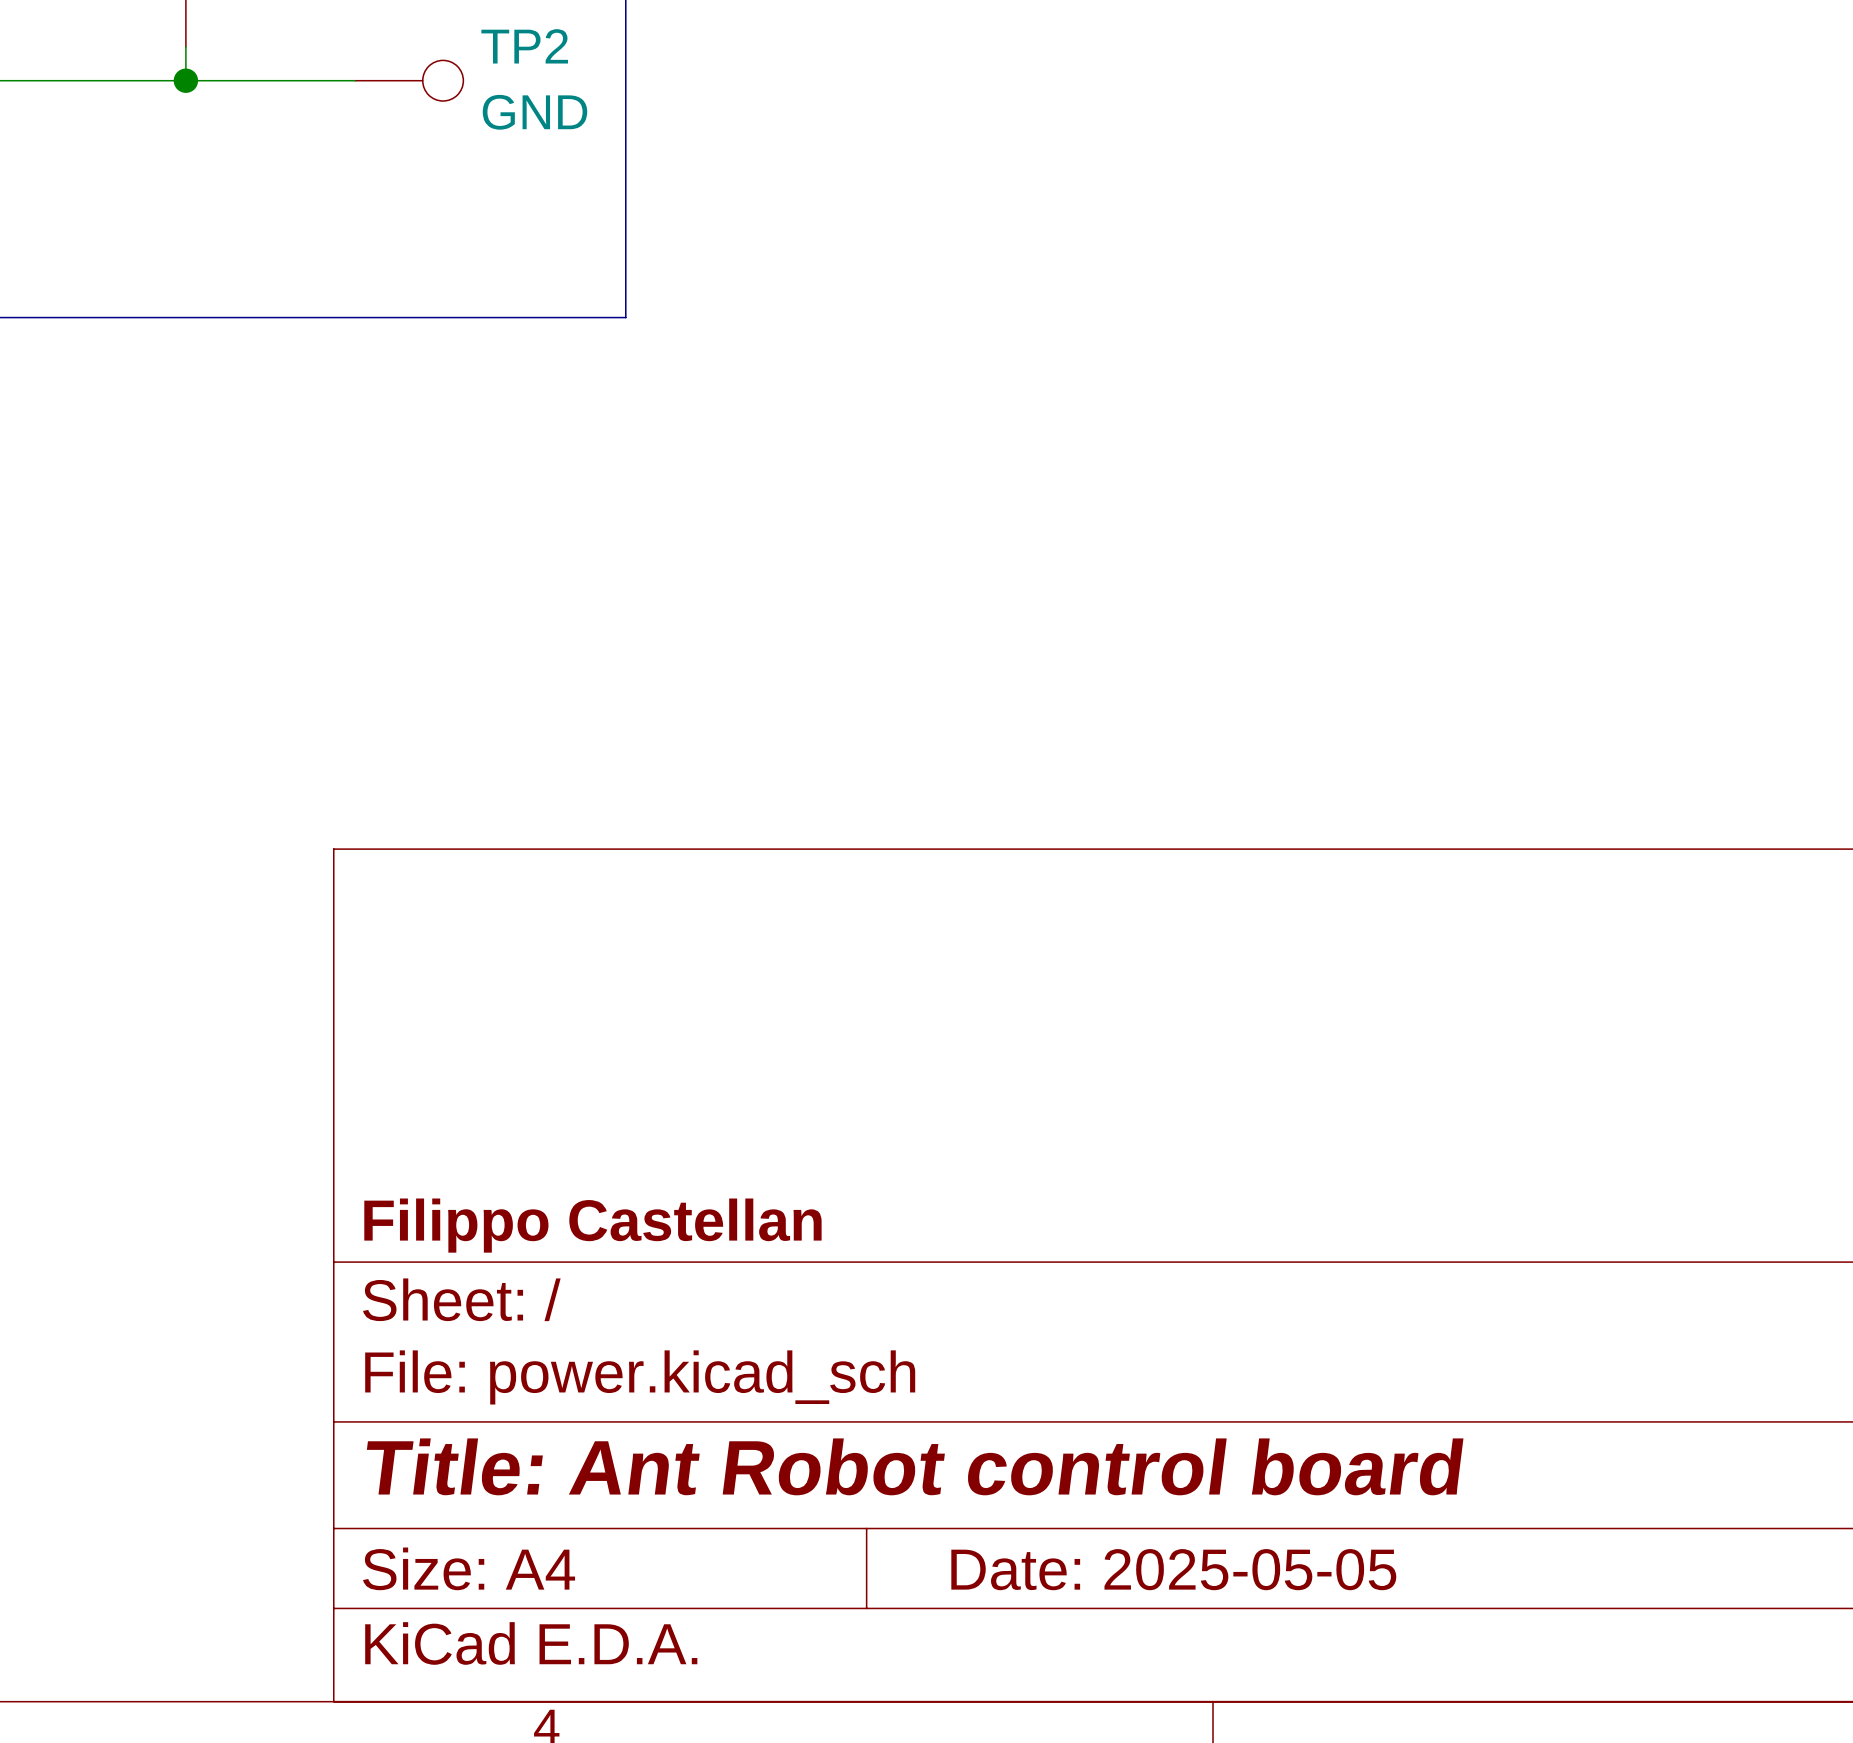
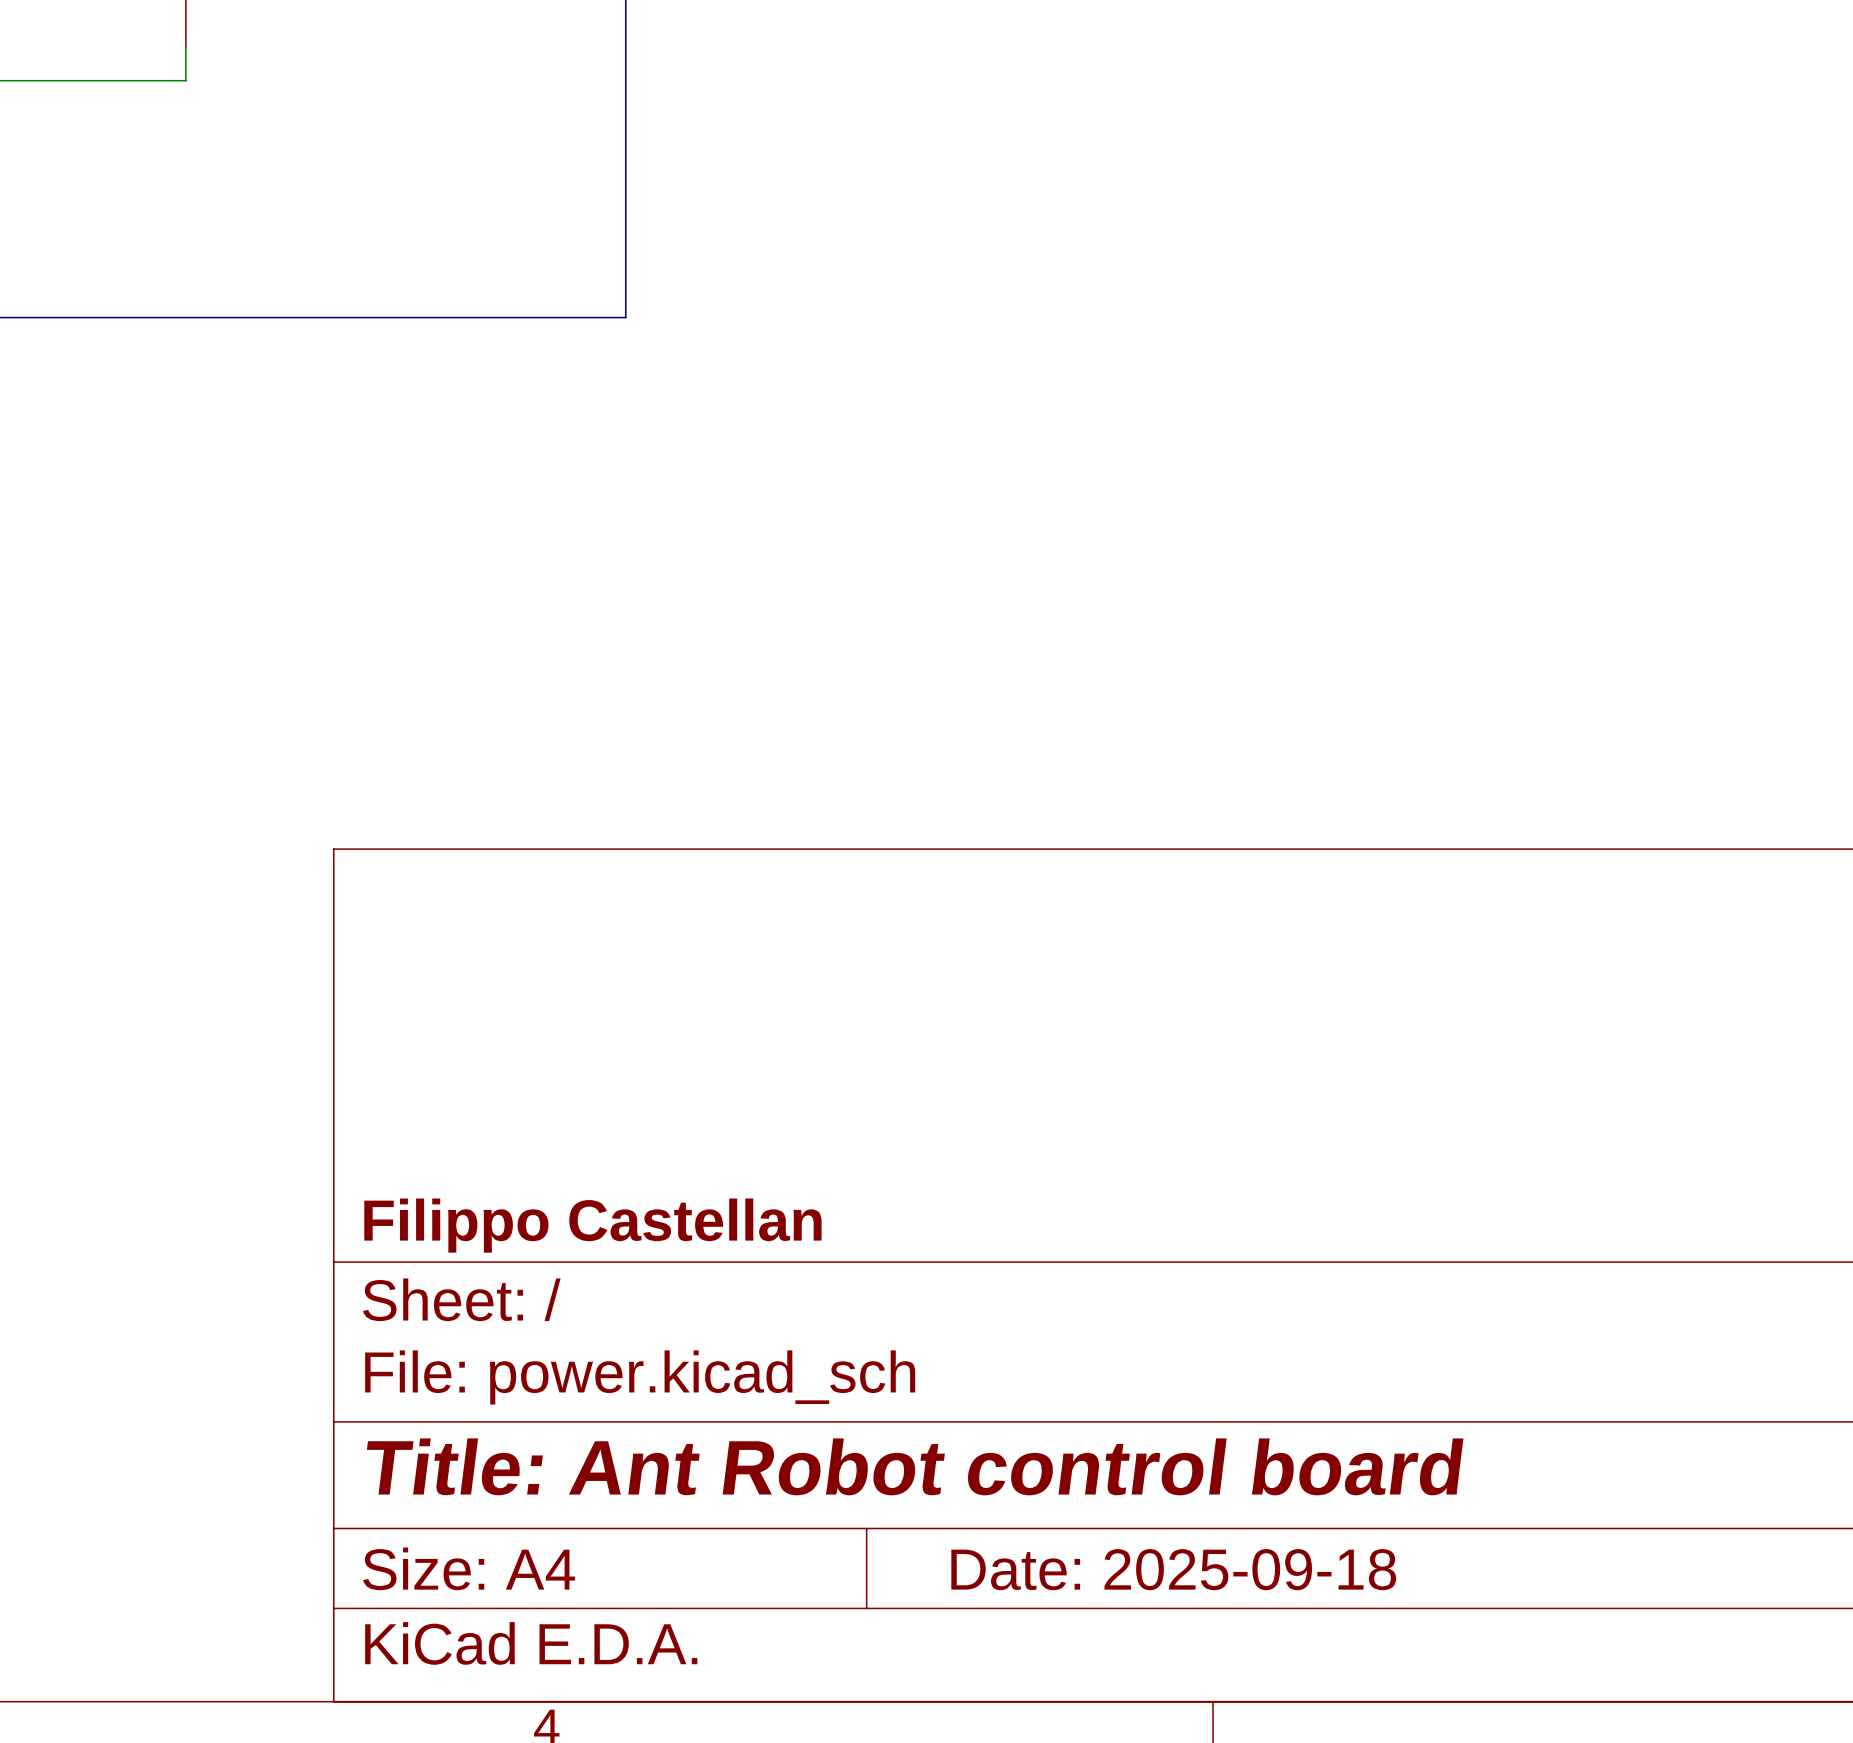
wire: (185, 80) (355, 80) -> none
junction: (185, 80) -> none
TP2: GND (409, 80) -> none
title block: Date: 2025-05-05 (1173, 1569) -> Date: 2025-09-18 (1173, 1569)

